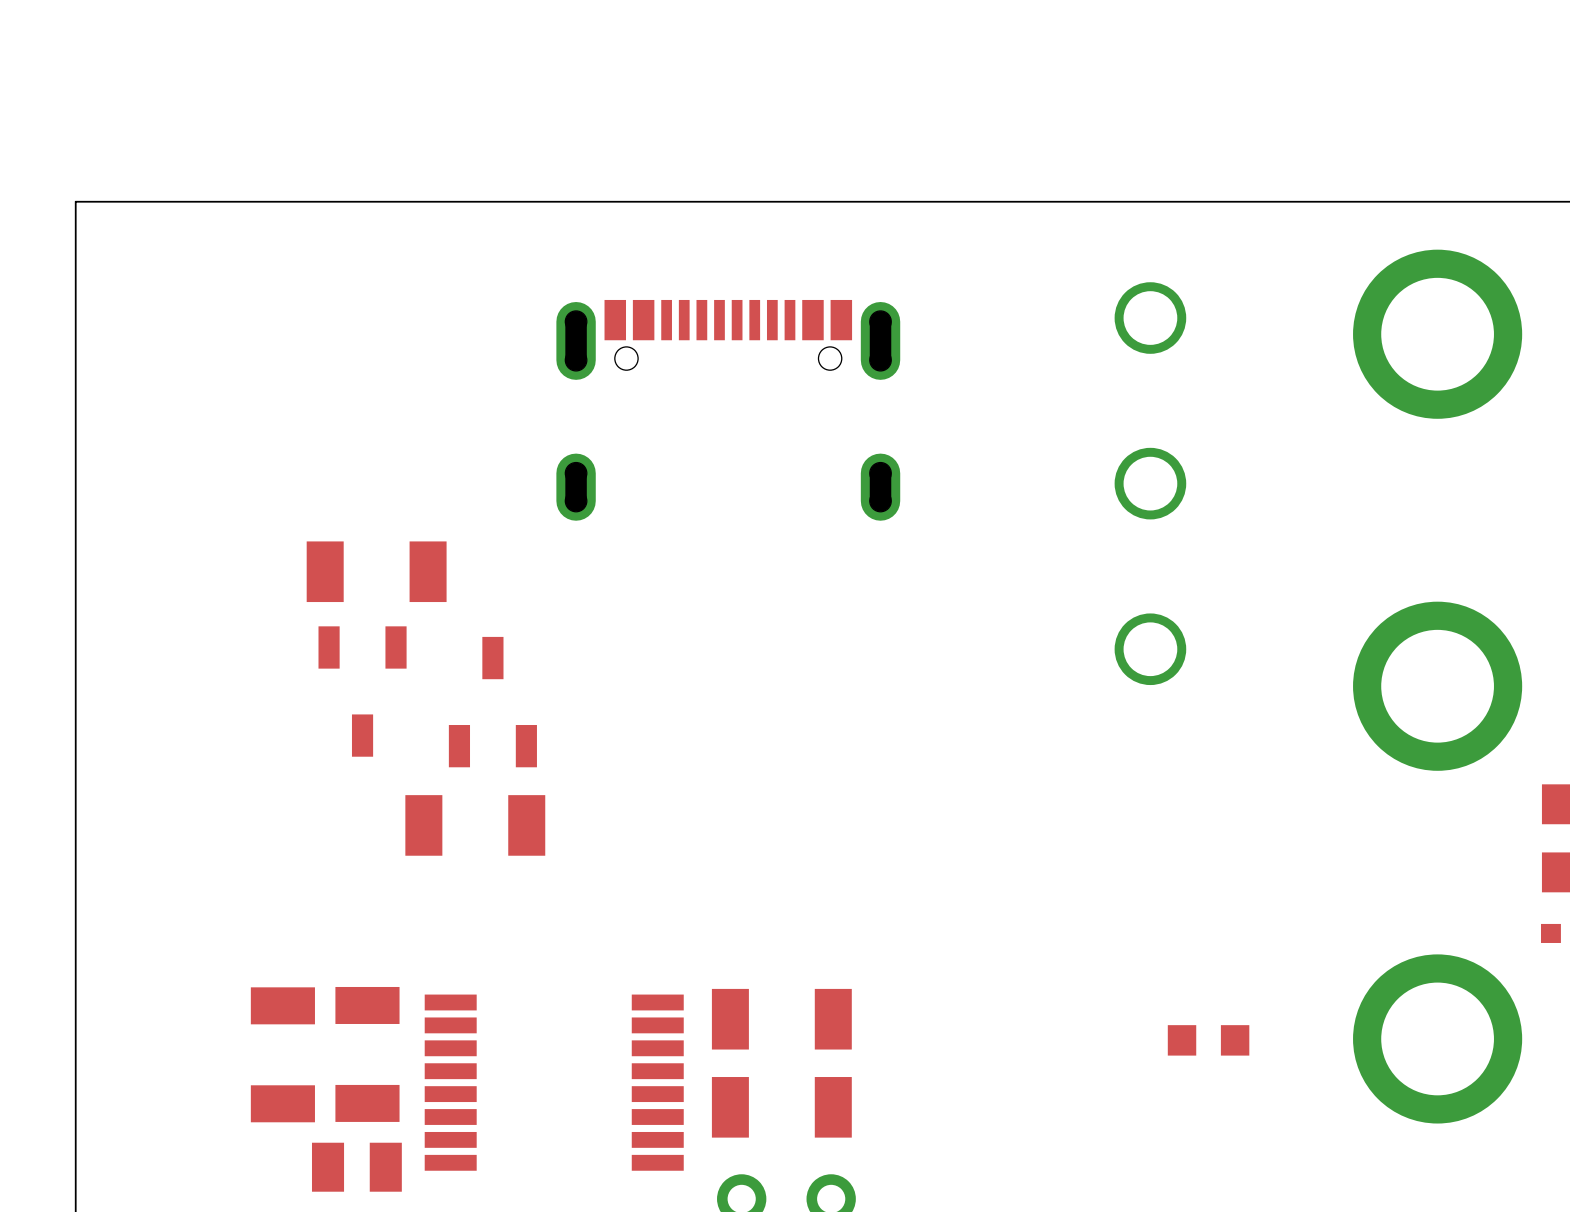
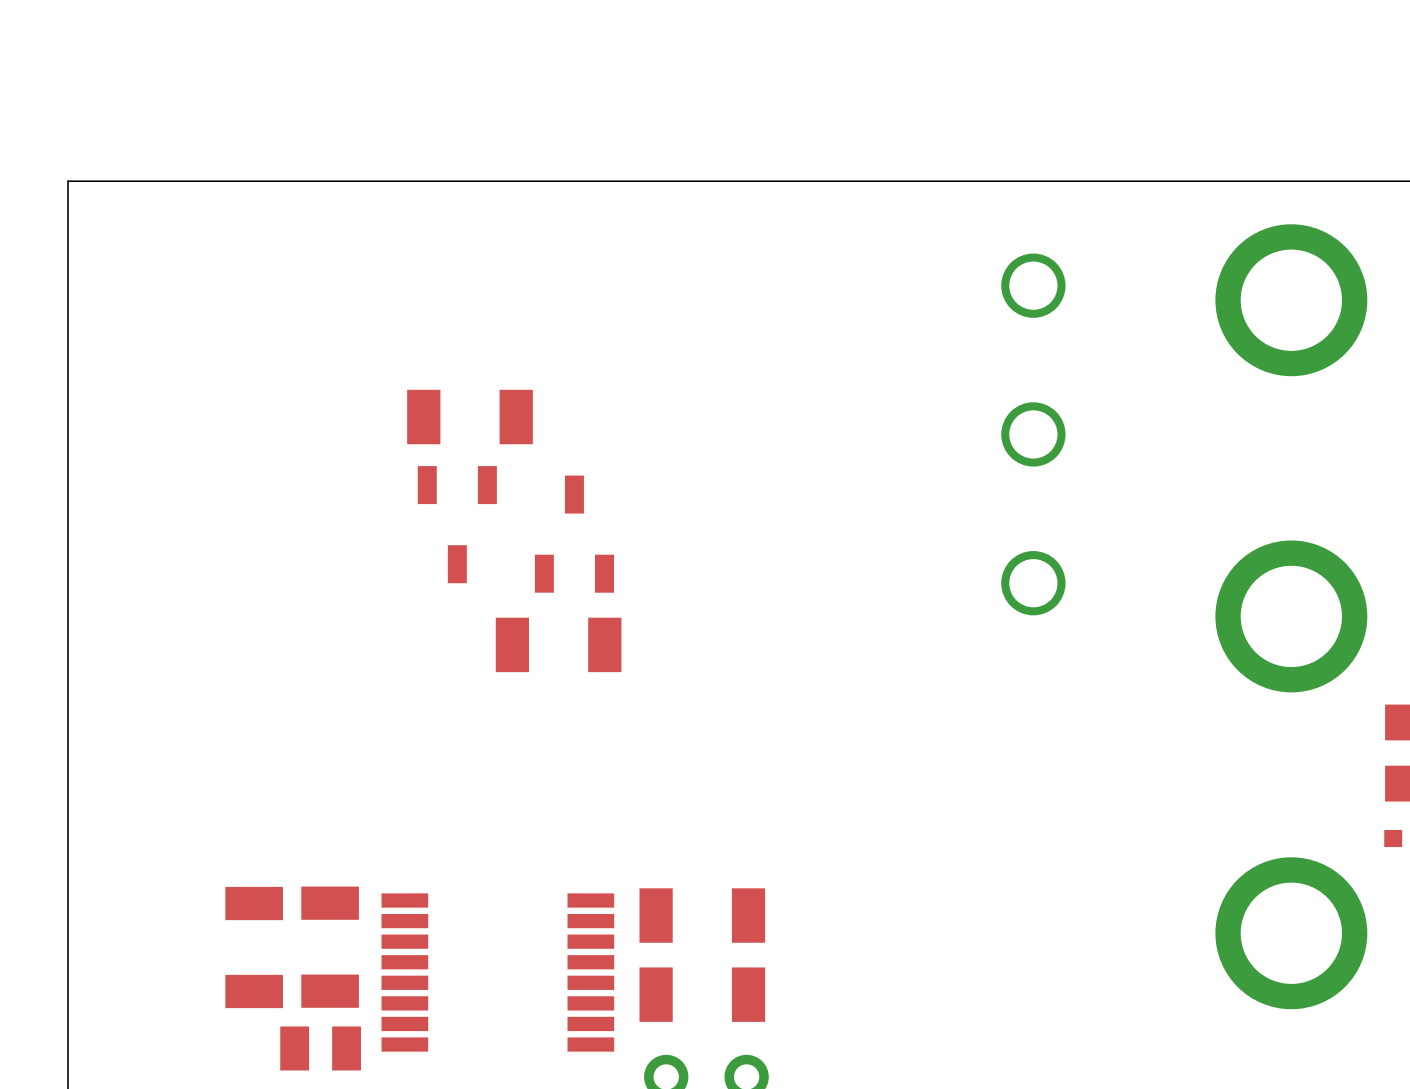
part: (728, 410) -> none
part: none -> (469, 417)
part: (376, 571) -> none
part: none -> (457, 524)
part: none -> (574, 534)
part: (362, 691) -> none
part: (492, 702) -> none
part: none -> (558, 644)
part: (475, 825) -> none
part: (1208, 1040) -> none

